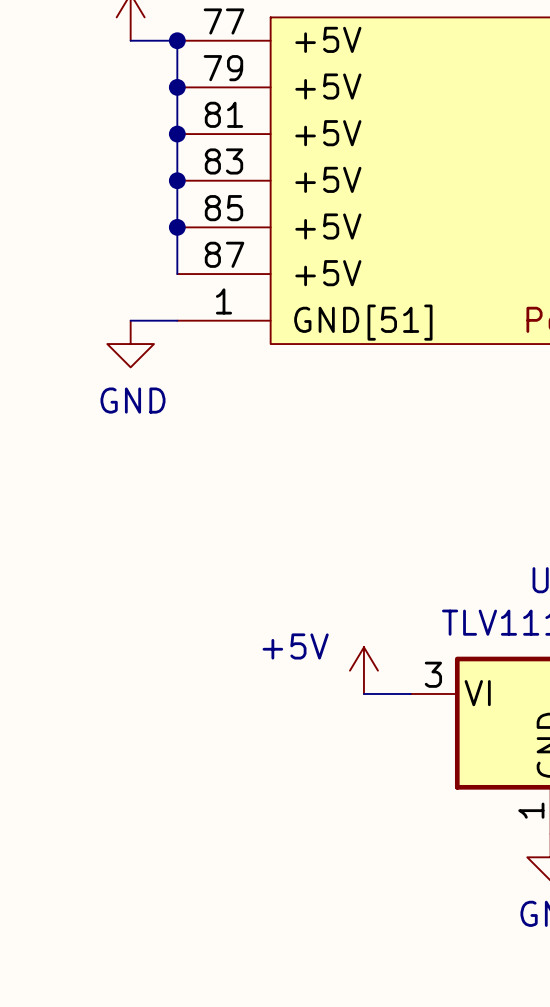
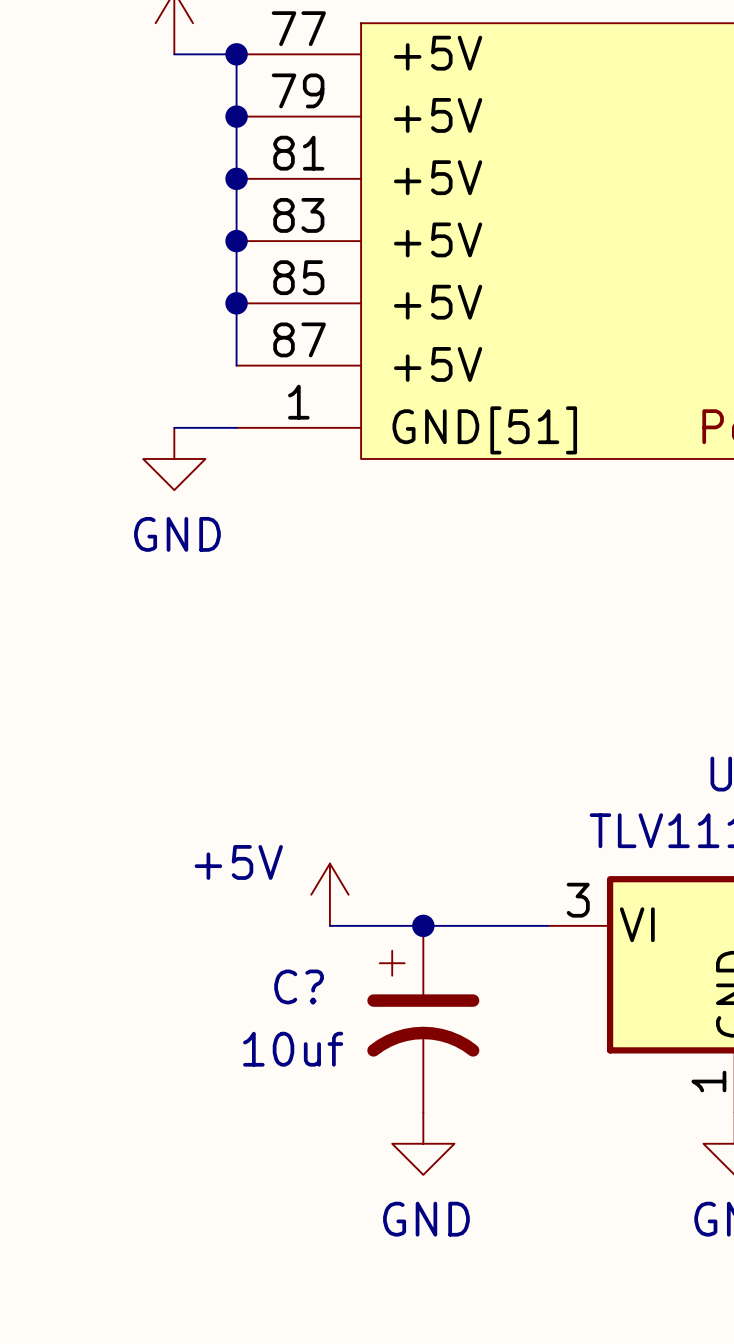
power symbol position: +5V (363, 670) -> +5V (329, 894)
wire: none -> (329, 925) (485, 925)
junction: none -> (423, 925)
C?: none -> 10uf (423, 1019)
power symbol: none -> GND (423, 1143)

